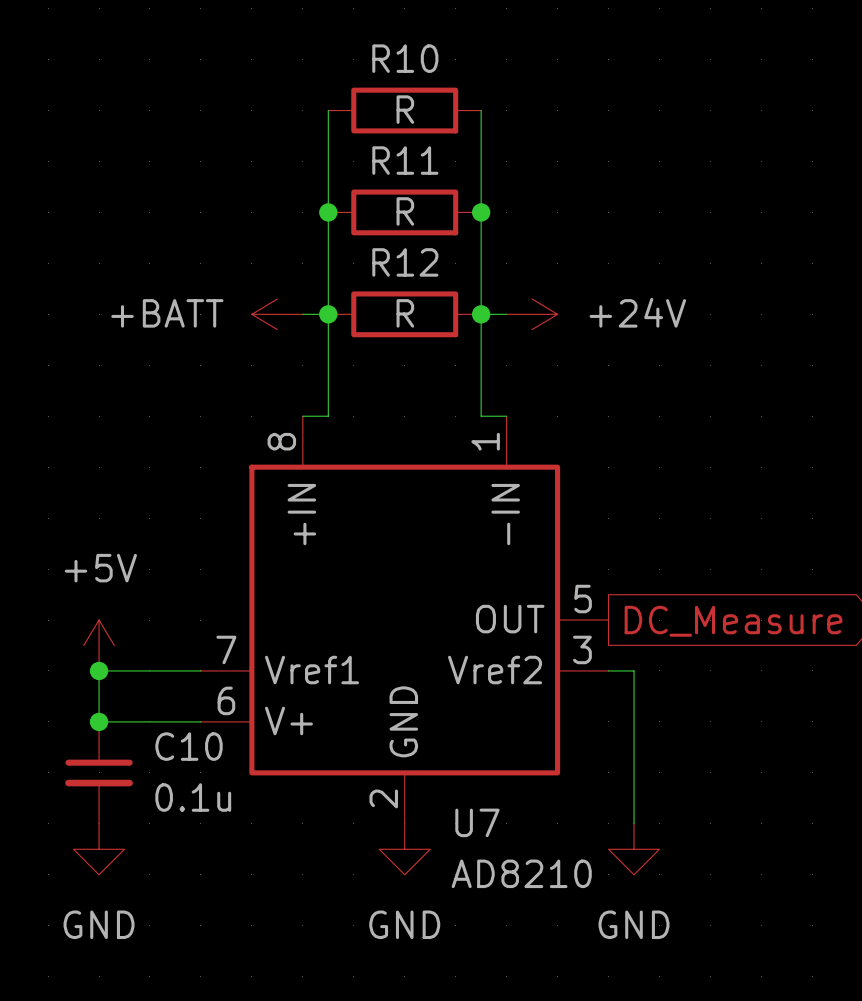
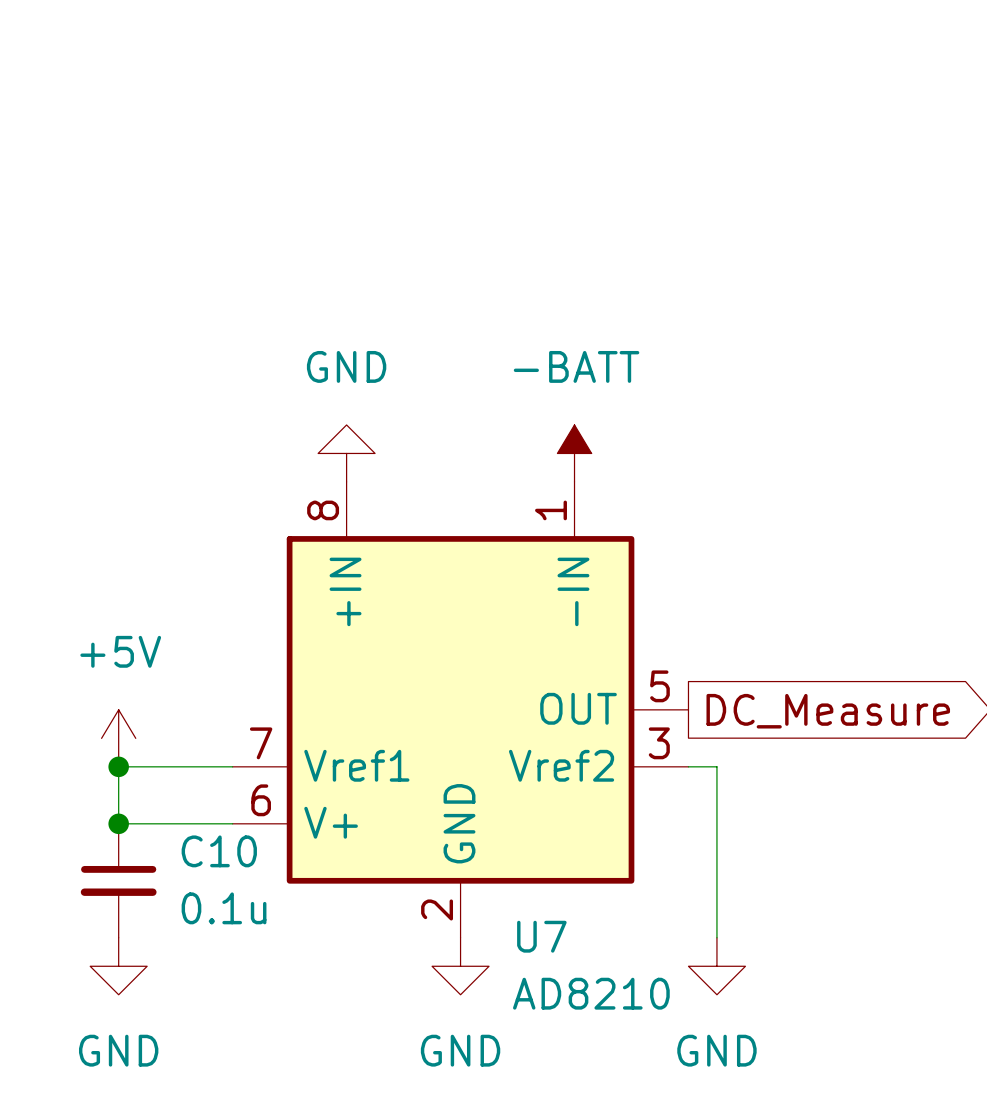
wire: (328, 110) (328, 416) (302, 416) -> none
R10: R (404, 110) -> none
wire: (481, 110) (481, 416) (506, 416) -> none
junction: (328, 212) -> none
R11: R (404, 212) -> none
junction: (481, 212) -> none
power symbol: +BATT (277, 314) -> none
wire: (302, 314) (328, 314) -> none
junction: (328, 314) -> none
R12: R (404, 314) -> none
wire: (481, 314) (506, 314) -> none
junction: (481, 314) -> none
power symbol: +24V (532, 314) -> none
power symbol: none -> GND (346, 453)
power symbol: none -> -BATT (574, 453)

